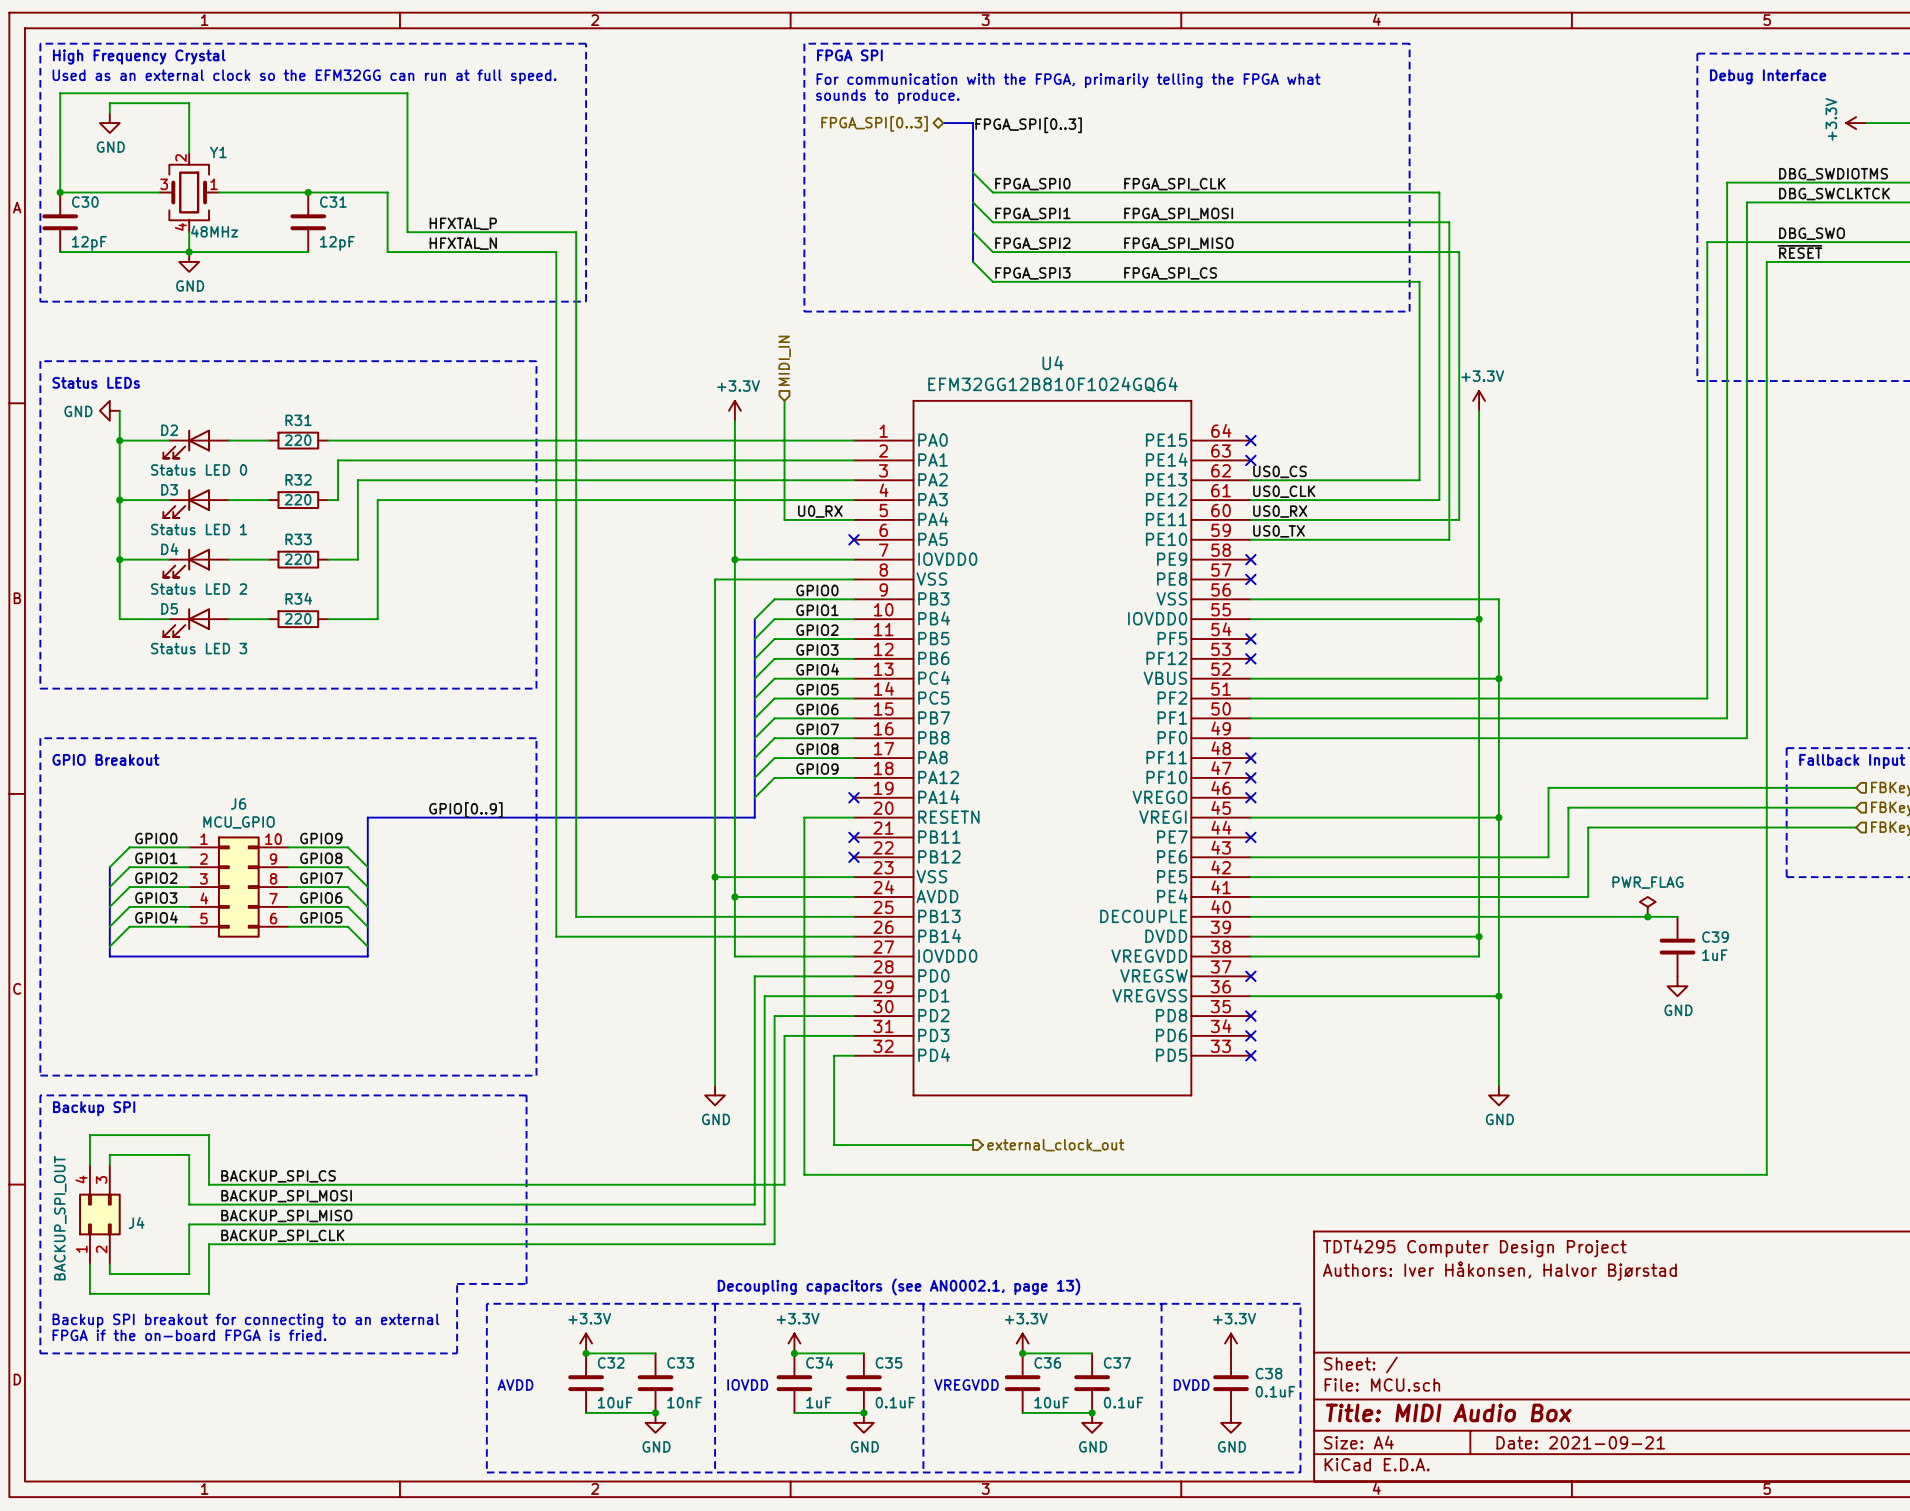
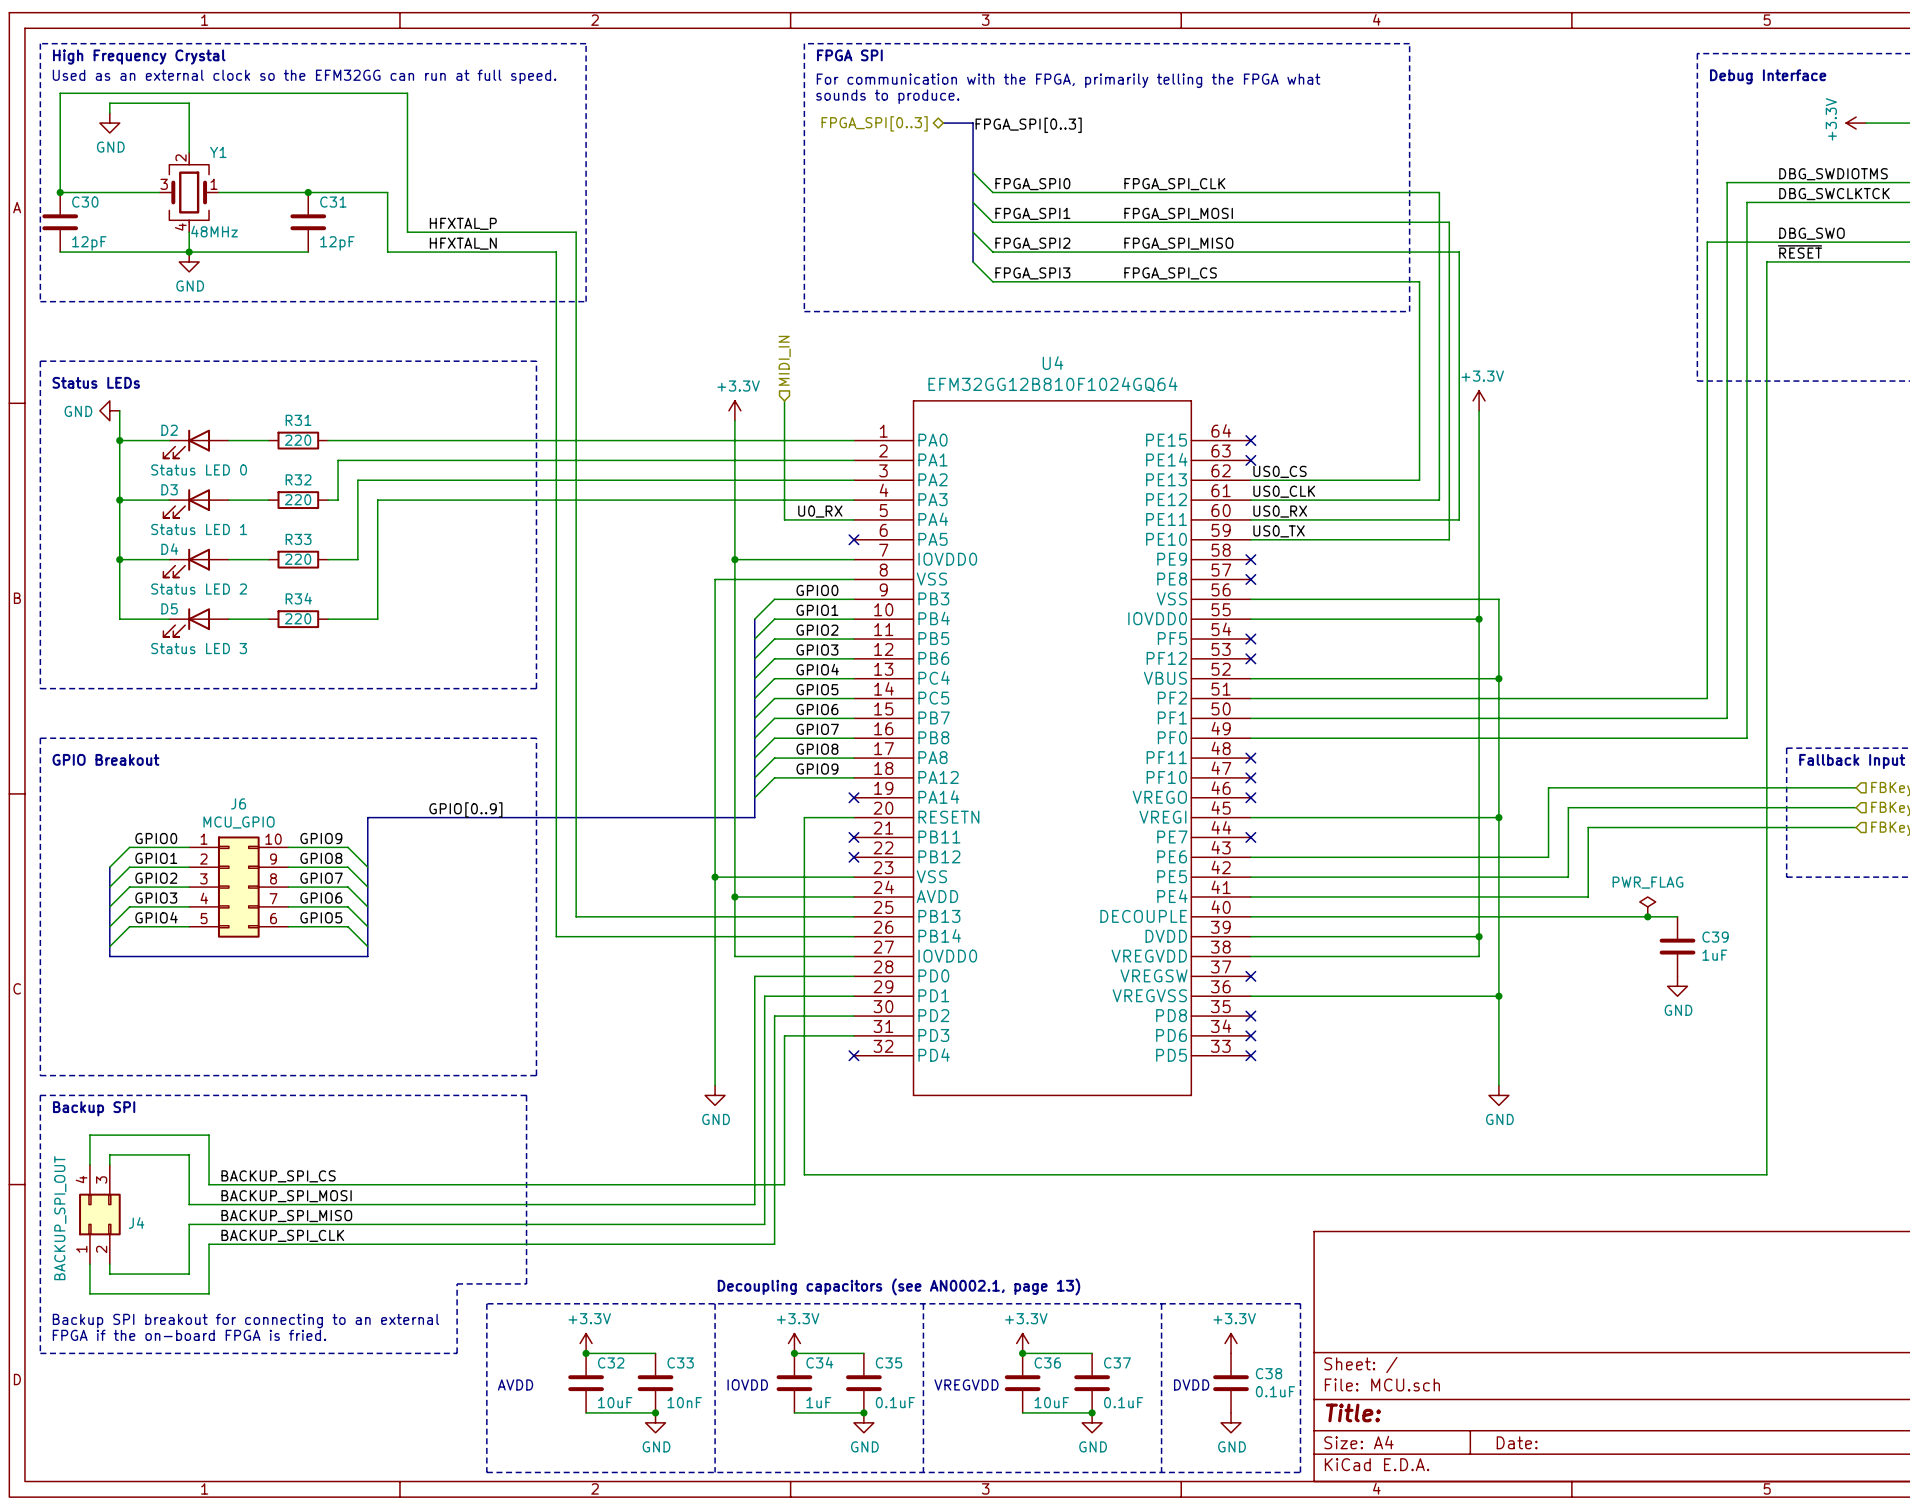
wire: (853, 1055) (834, 1055) (834, 1145) (973, 1145) -> none
no-connect mark: none -> (853, 1055)
hierarchical label: external_clock_out (1055, 1145) -> none
title block: TDT4295 Computer Design Project (1474, 1248) -> none
title block: Authors: Iver Håkonsen, Halvor Bjørstad (1499, 1270) -> none
title block: Title: MIDI Audio Box (1448, 1412) -> Title: (1353, 1412)
title block: Date: 2021-09-21 (1580, 1442) -> Date: (1517, 1442)

